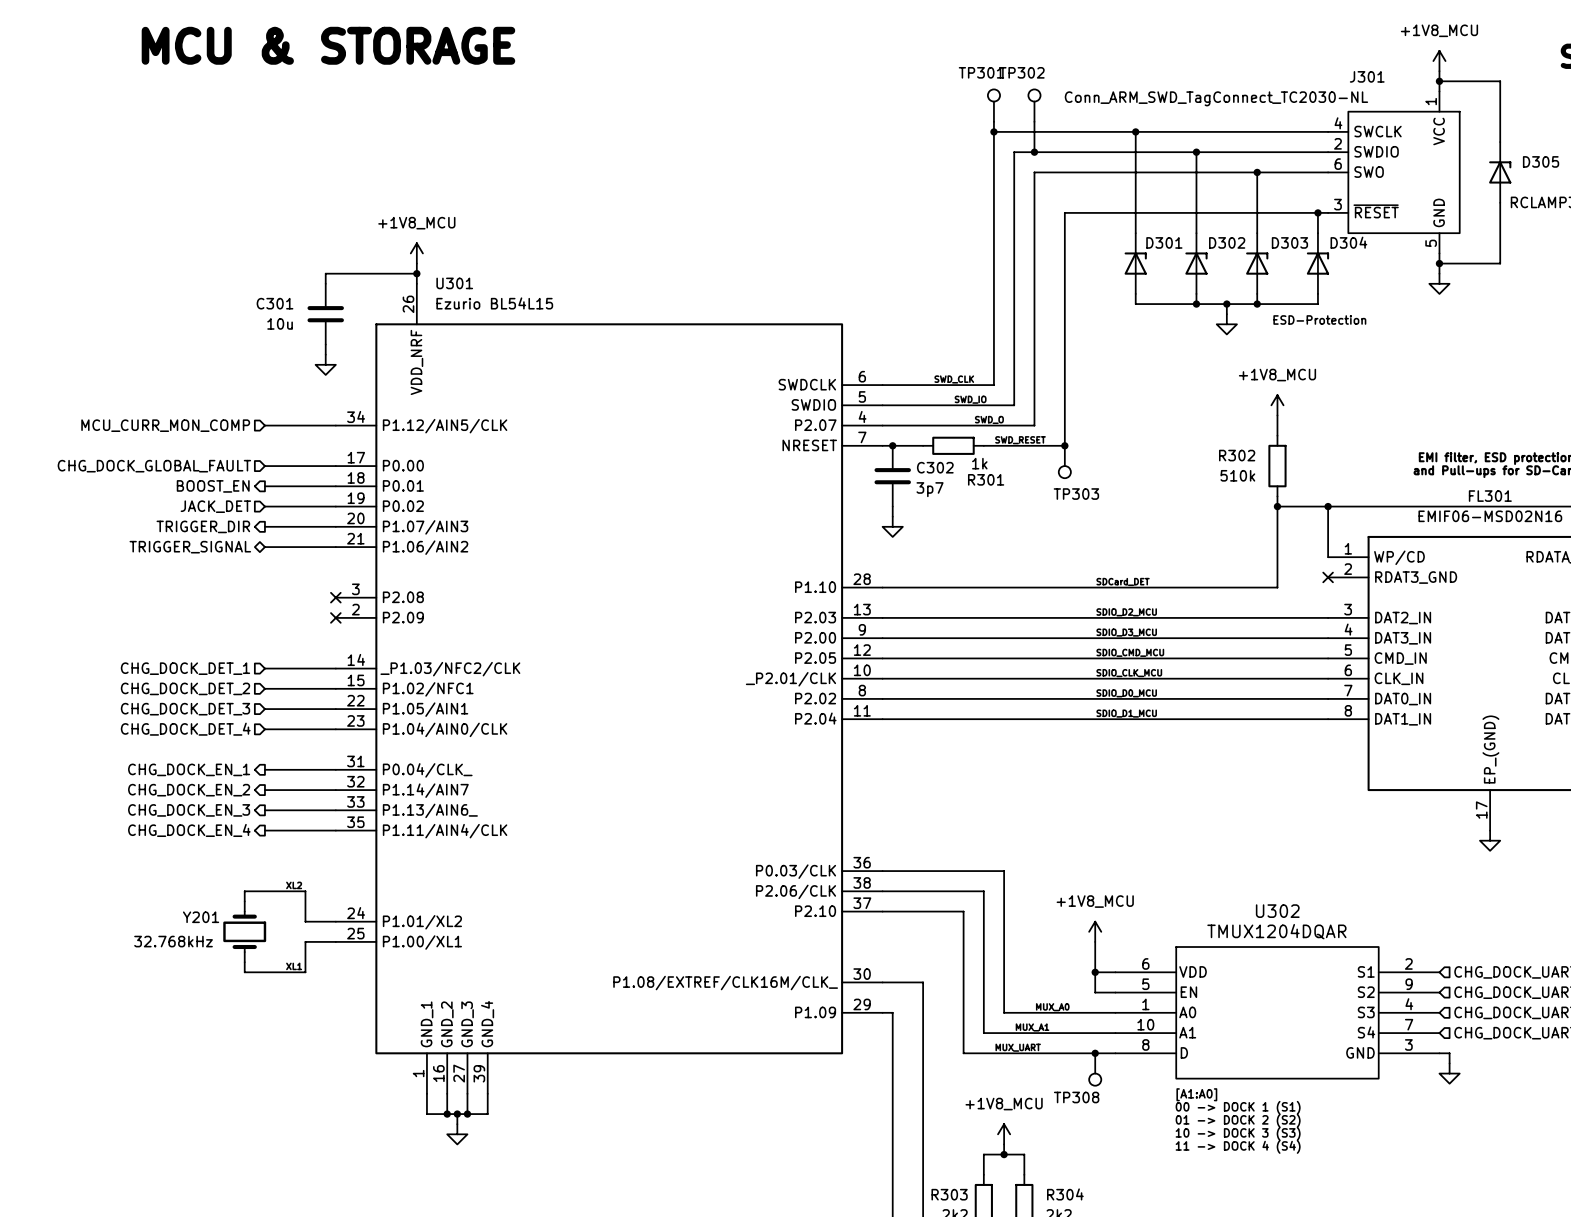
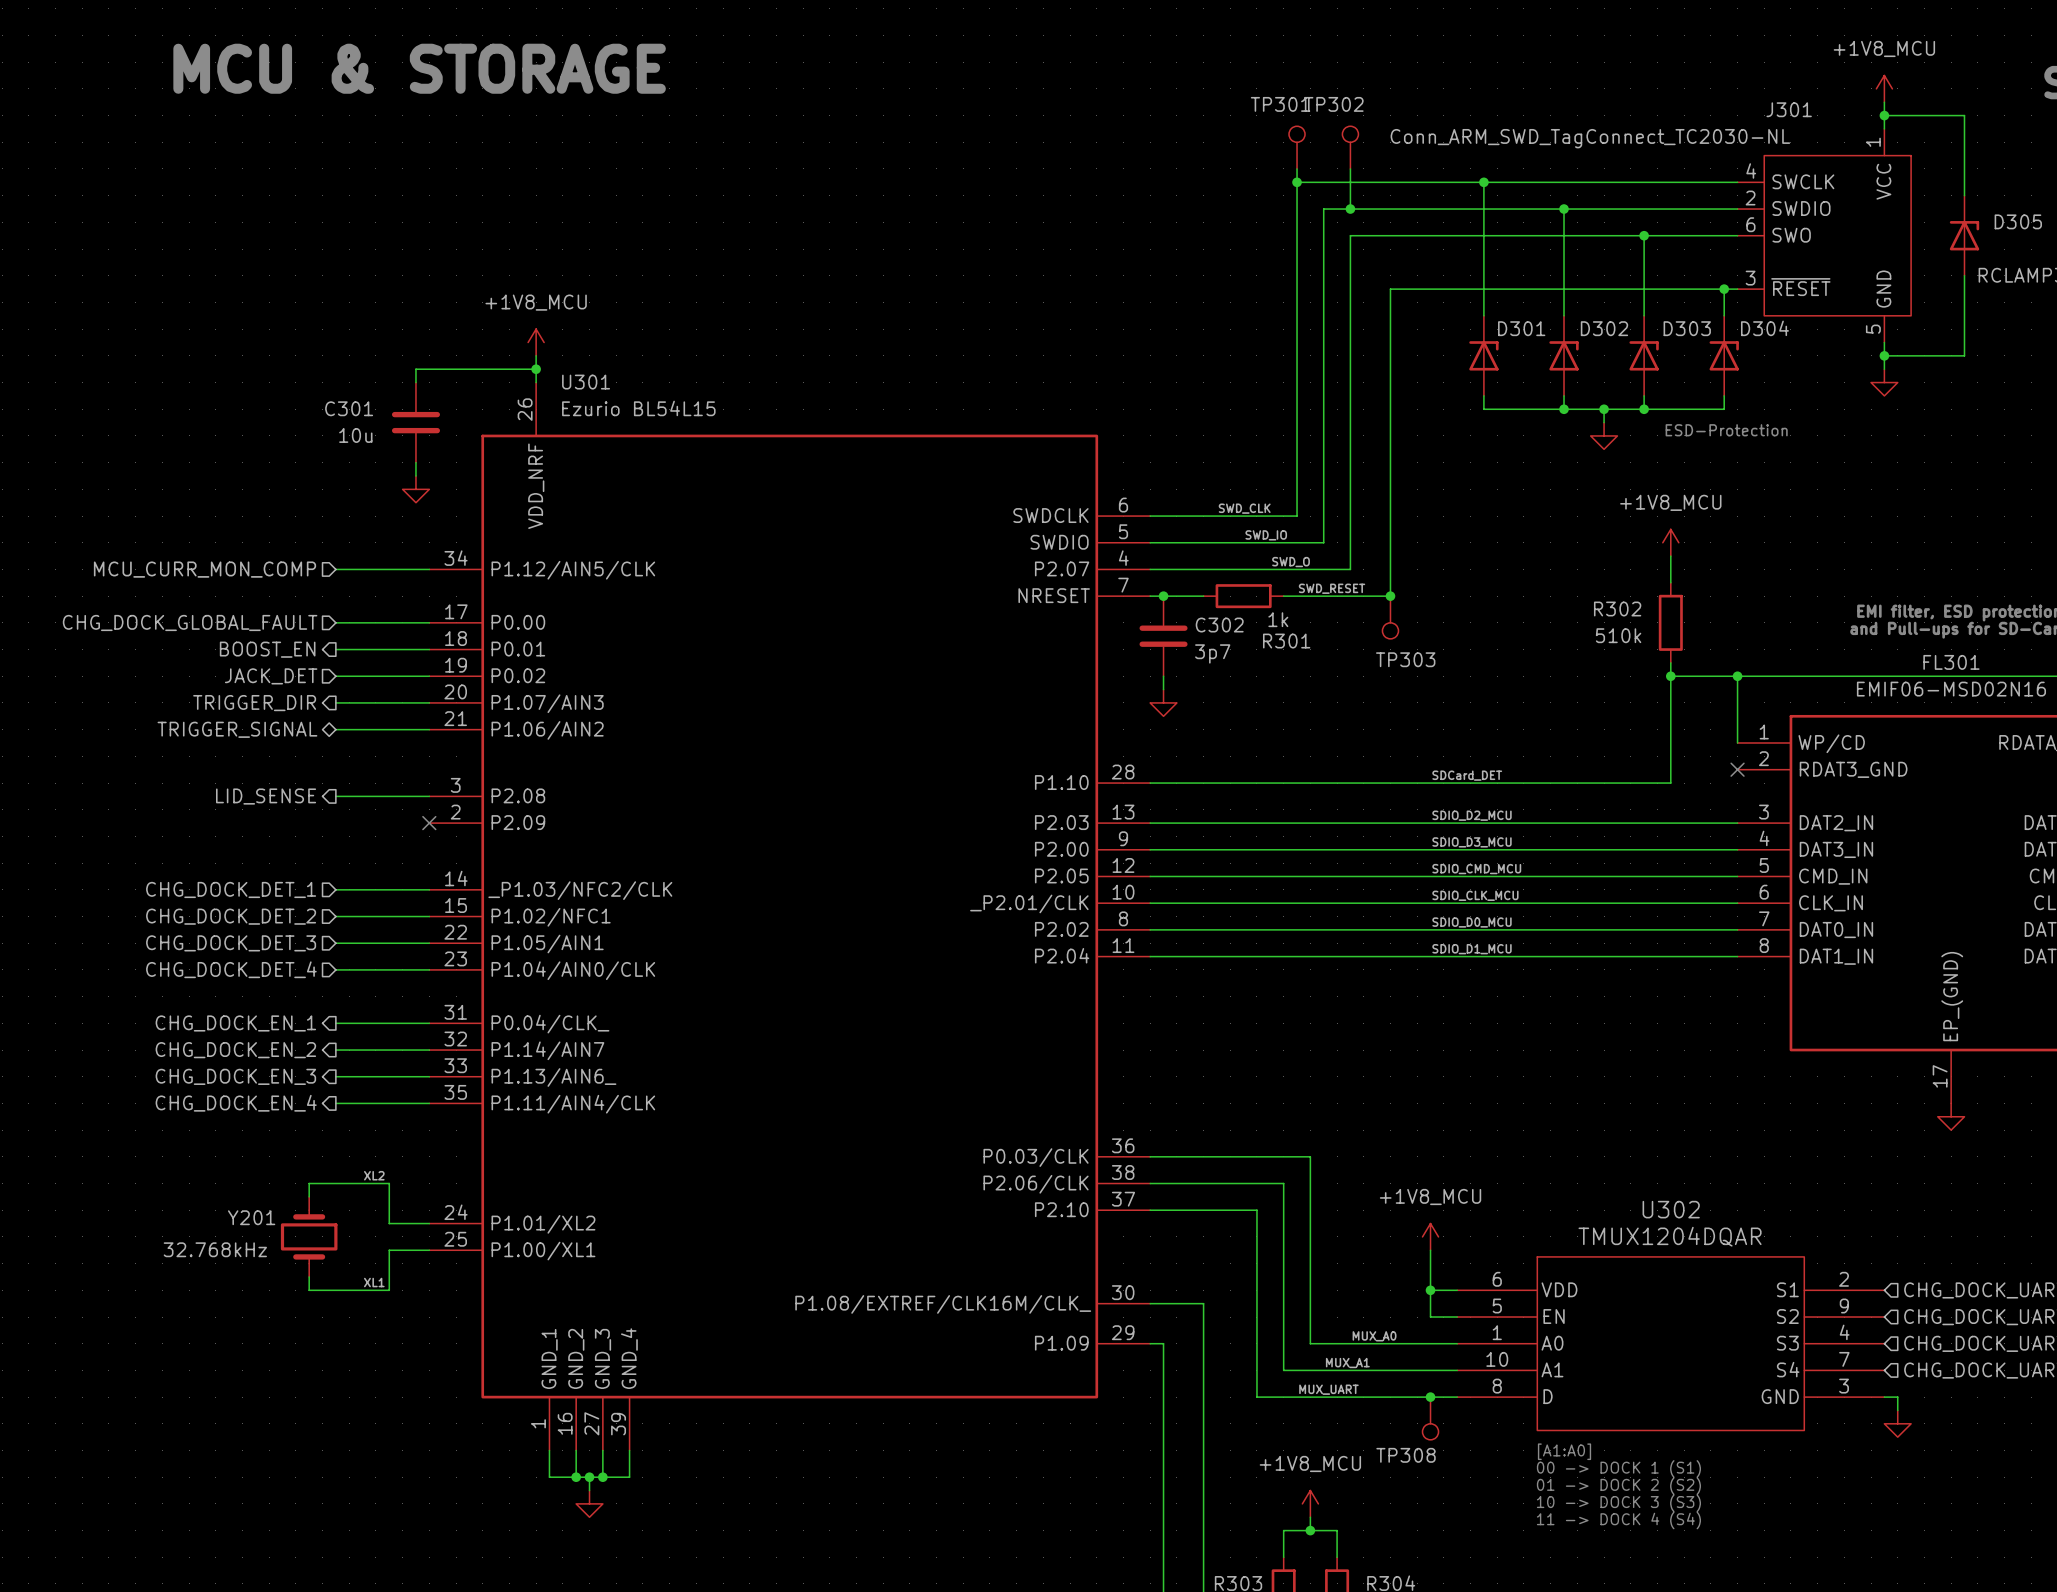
hierarchical label: none -> LID_SENSE (266, 796)
wire: none -> (335, 796) (429, 796)
no-connect mark: (335, 597) -> none

